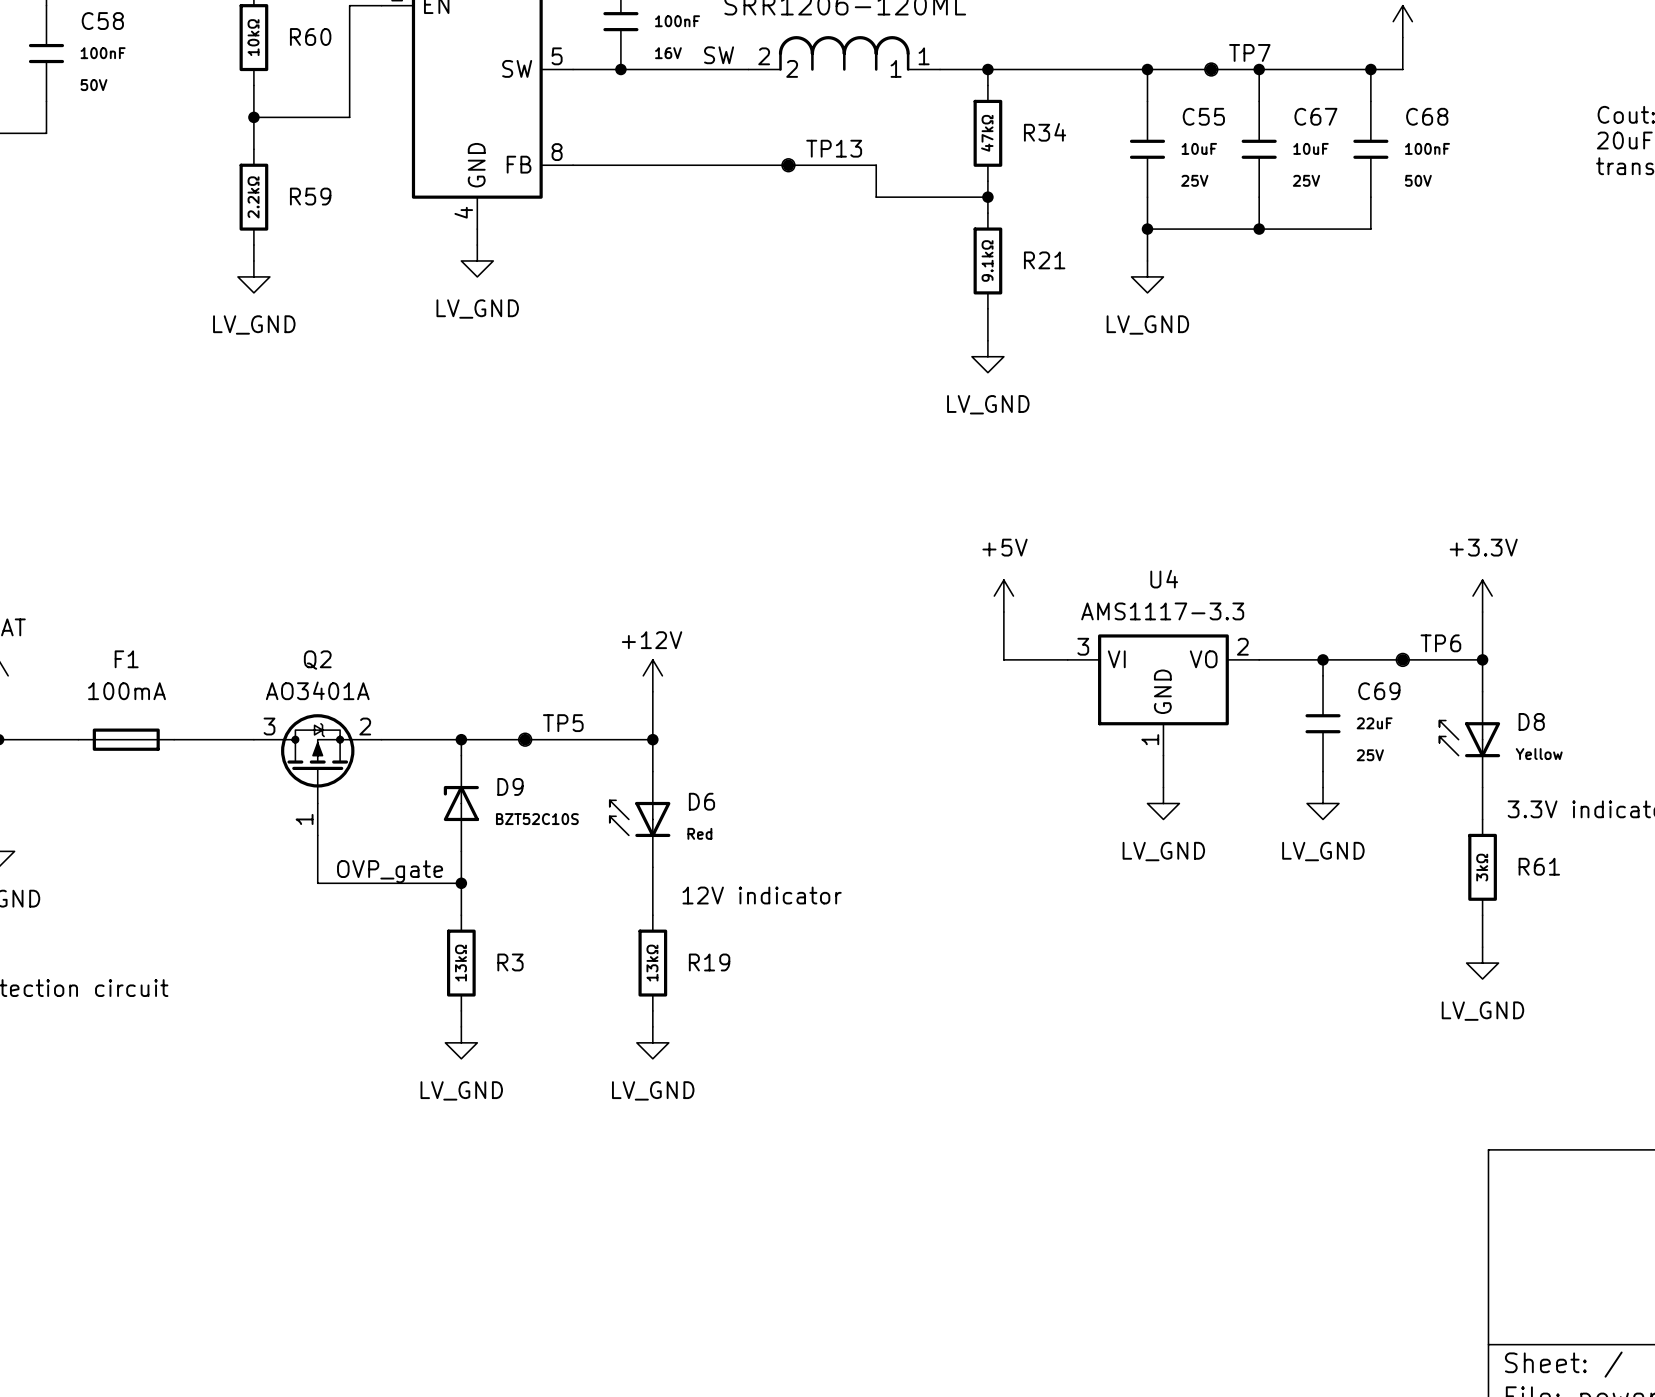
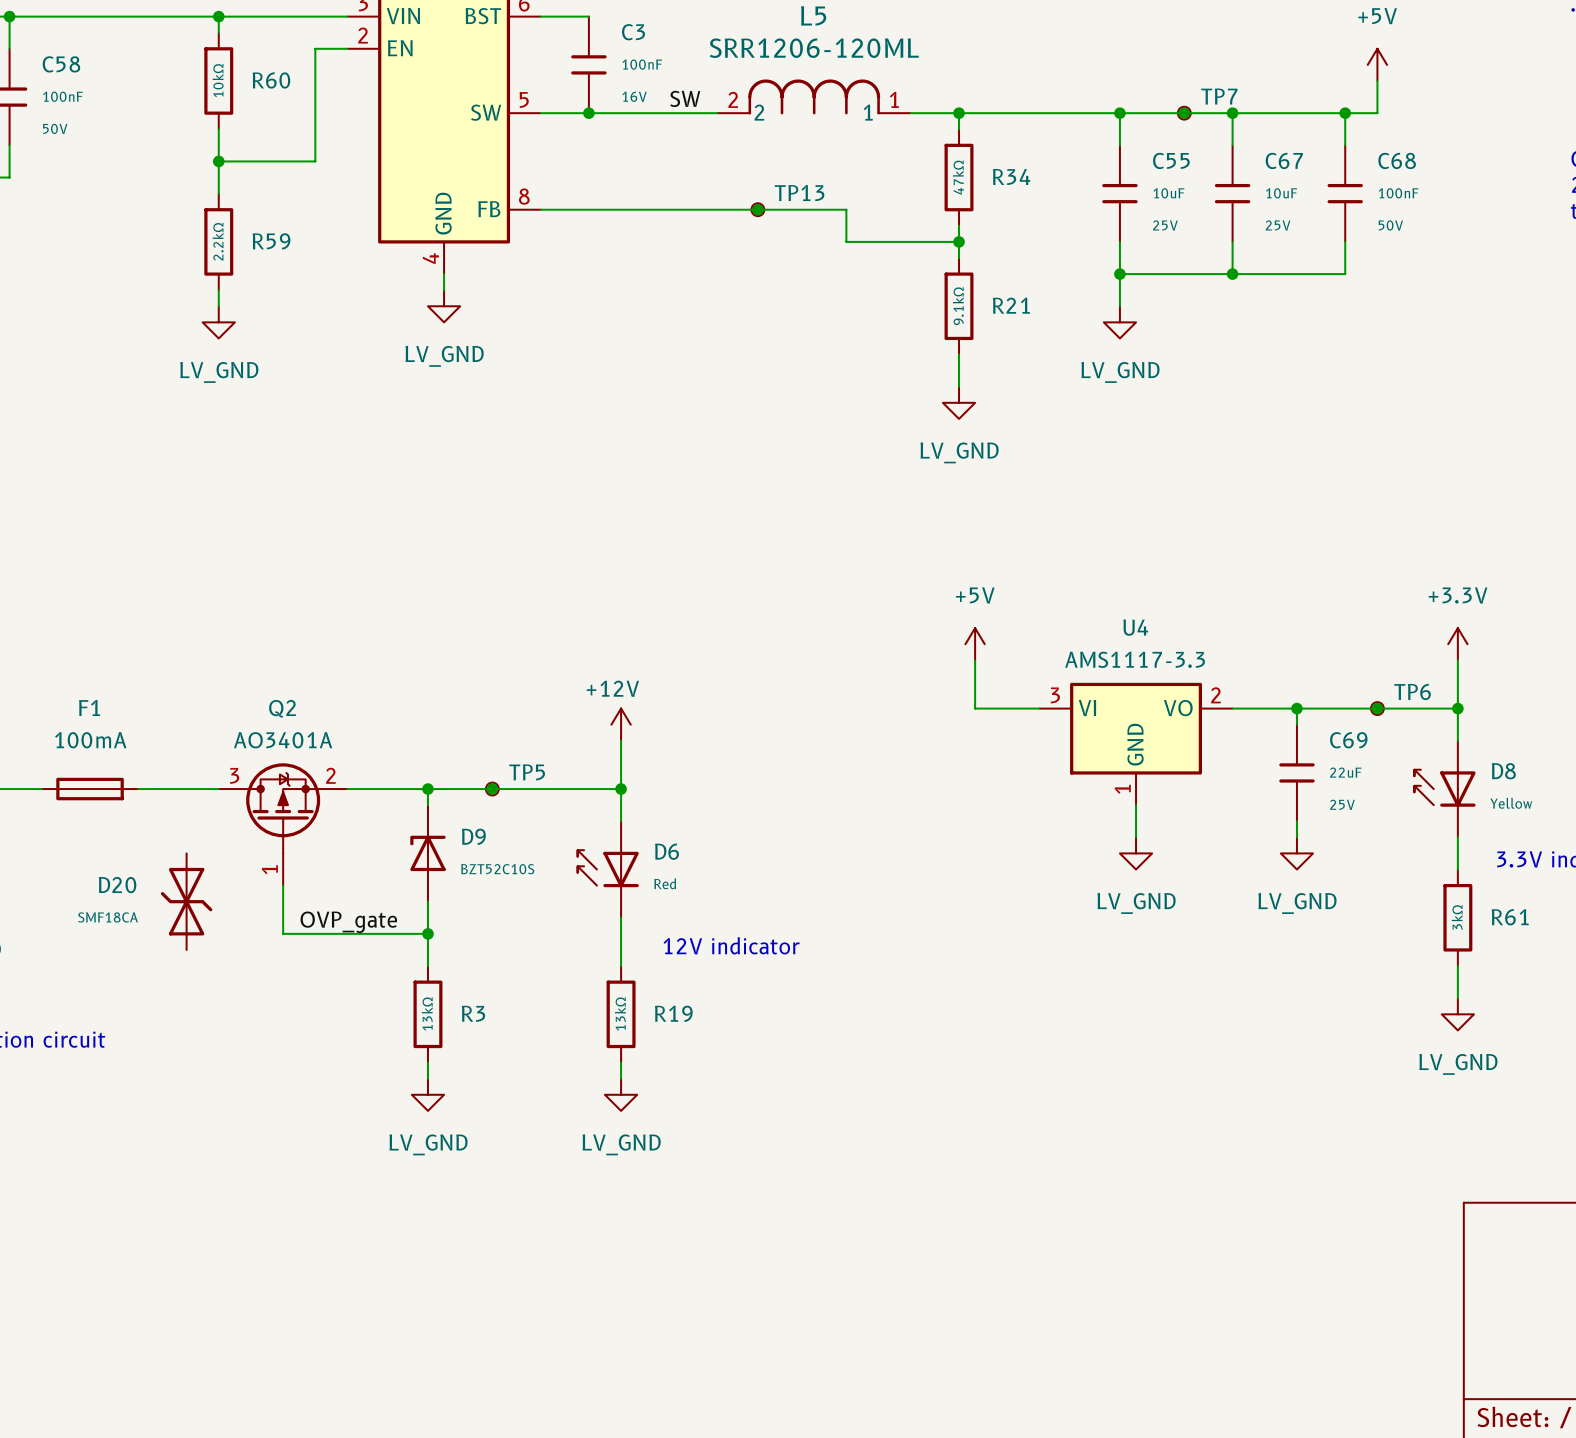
D20: none -> SMF18CA (186, 901)

